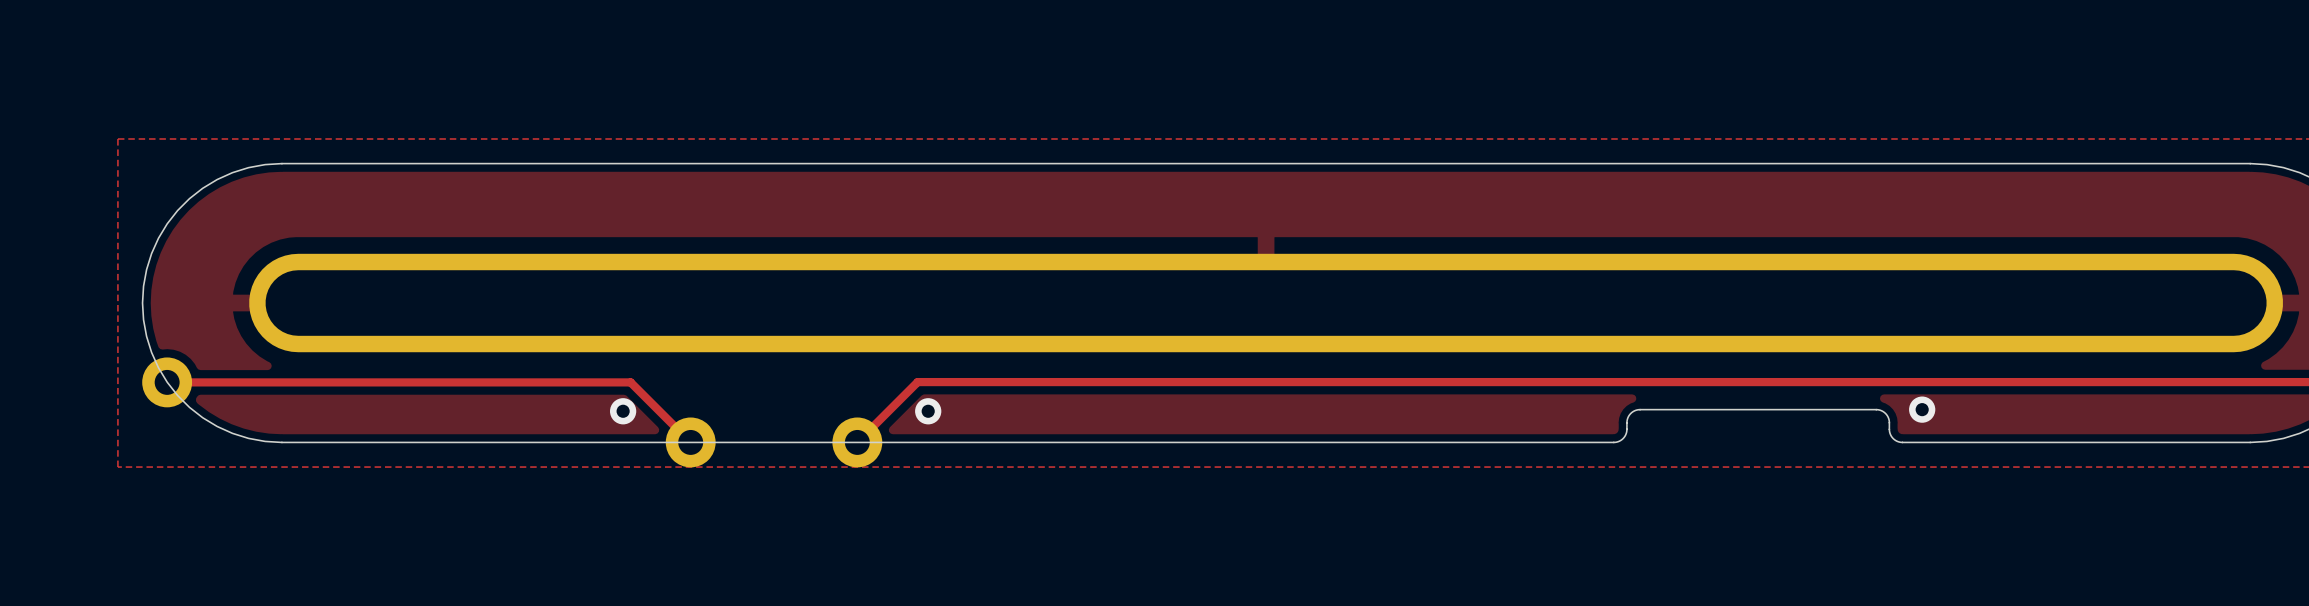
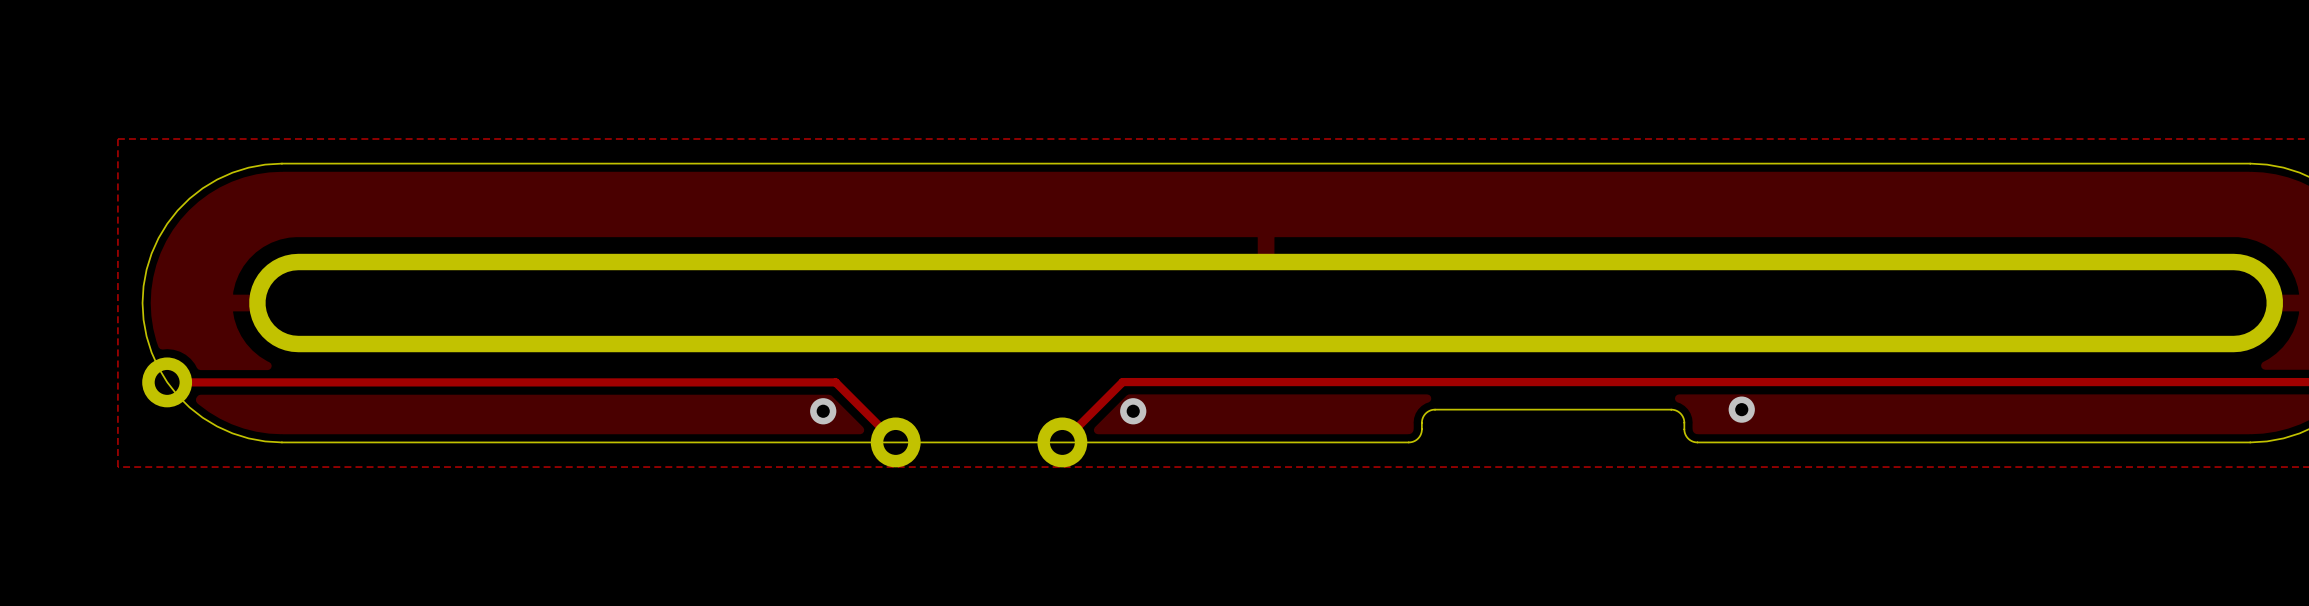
track: (630, 382) (690, 442) -> (630, 382) (835, 382) (895, 442)
track: (1122, 382) (917, 382) (857, 442) -> (1122, 382) (1062, 442)
board edge: (1640, 409) (1629, 414) (1625, 435) (1620, 440) (1615, 442) (1408, 442) -> (1640, 409) (1433, 409) (1428, 411) (1423, 417) (1419, 437) (1408, 442)
board edge: (1671, 409) (1877, 409) (1883, 411) (1888, 417) (1892, 437) (1902, 442) -> (1671, 409) (1681, 414) (1685, 435) (1690, 440) (1696, 442) (1902, 442)
via position: (1922, 409) -> (1741, 409)
via: (623, 411) -> none
via: none -> (823, 411)
via: (928, 411) -> none
via: none -> (1133, 411)
part: (690, 442) -> none
part position: (857, 442) -> (895, 442)
part: none -> (1062, 442)

